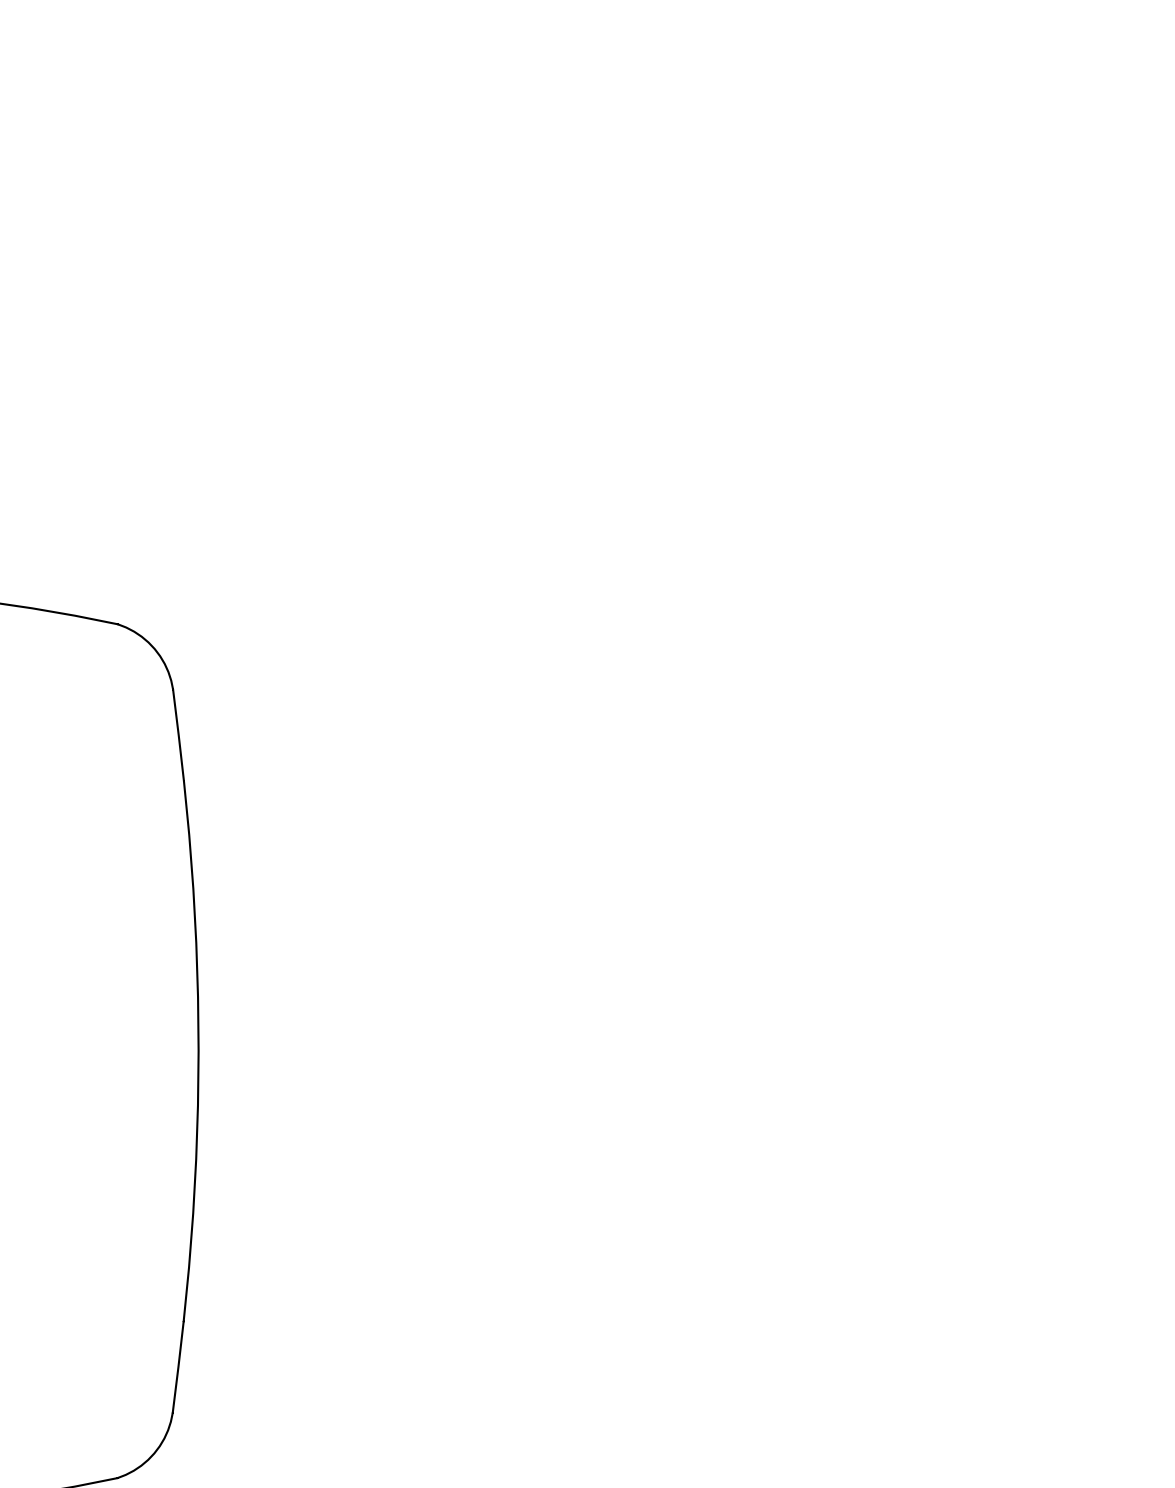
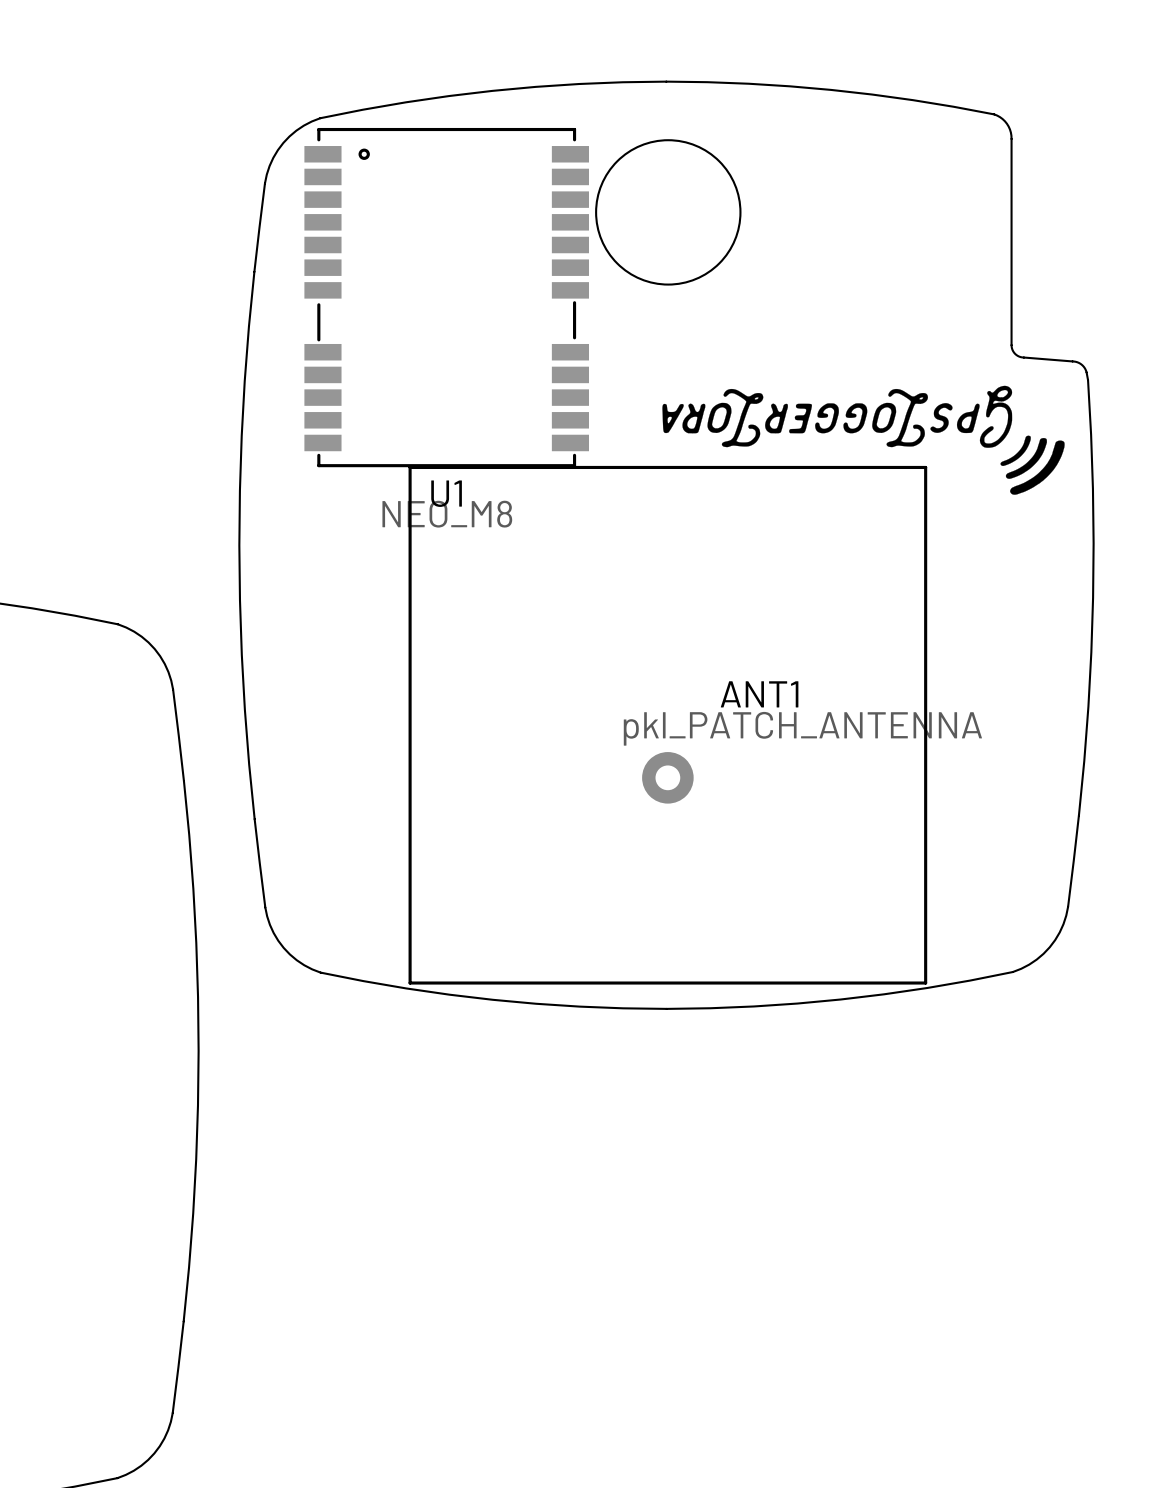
board edge: none -> (666, 81) (790, 86) (872, 94) (994, 114) (1002, 119) (1008, 126) (1011, 138) (1011, 348) (1015, 353) (1020, 357) (1078, 362) (1085, 369) (1088, 380) (1093, 543) (1091, 652) (1078, 815) (1068, 906) (1063, 924) (1055, 940) (1043, 953) (1029, 964) (1012, 972) (884, 994) (753, 1006) (666, 1008) (536, 1003) (406, 988) (320, 972) (312, 969) (296, 960) (283, 947) (273, 933) (267, 916) (249, 764) (241, 655) (239, 545) (244, 381) (259, 227) (264, 183) (269, 166) (277, 150) (289, 136) (303, 125) (320, 118) (405, 102) (492, 90) (579, 84) (666, 81)
round board edge: none -> [595, 139, 742, 286]
U1: none -> NEO_M8 (446, 297)
drawing: none -> [662, 385, 1065, 495]
ANT1: none -> pkl_PATCH_ANTENNA (667, 725)

